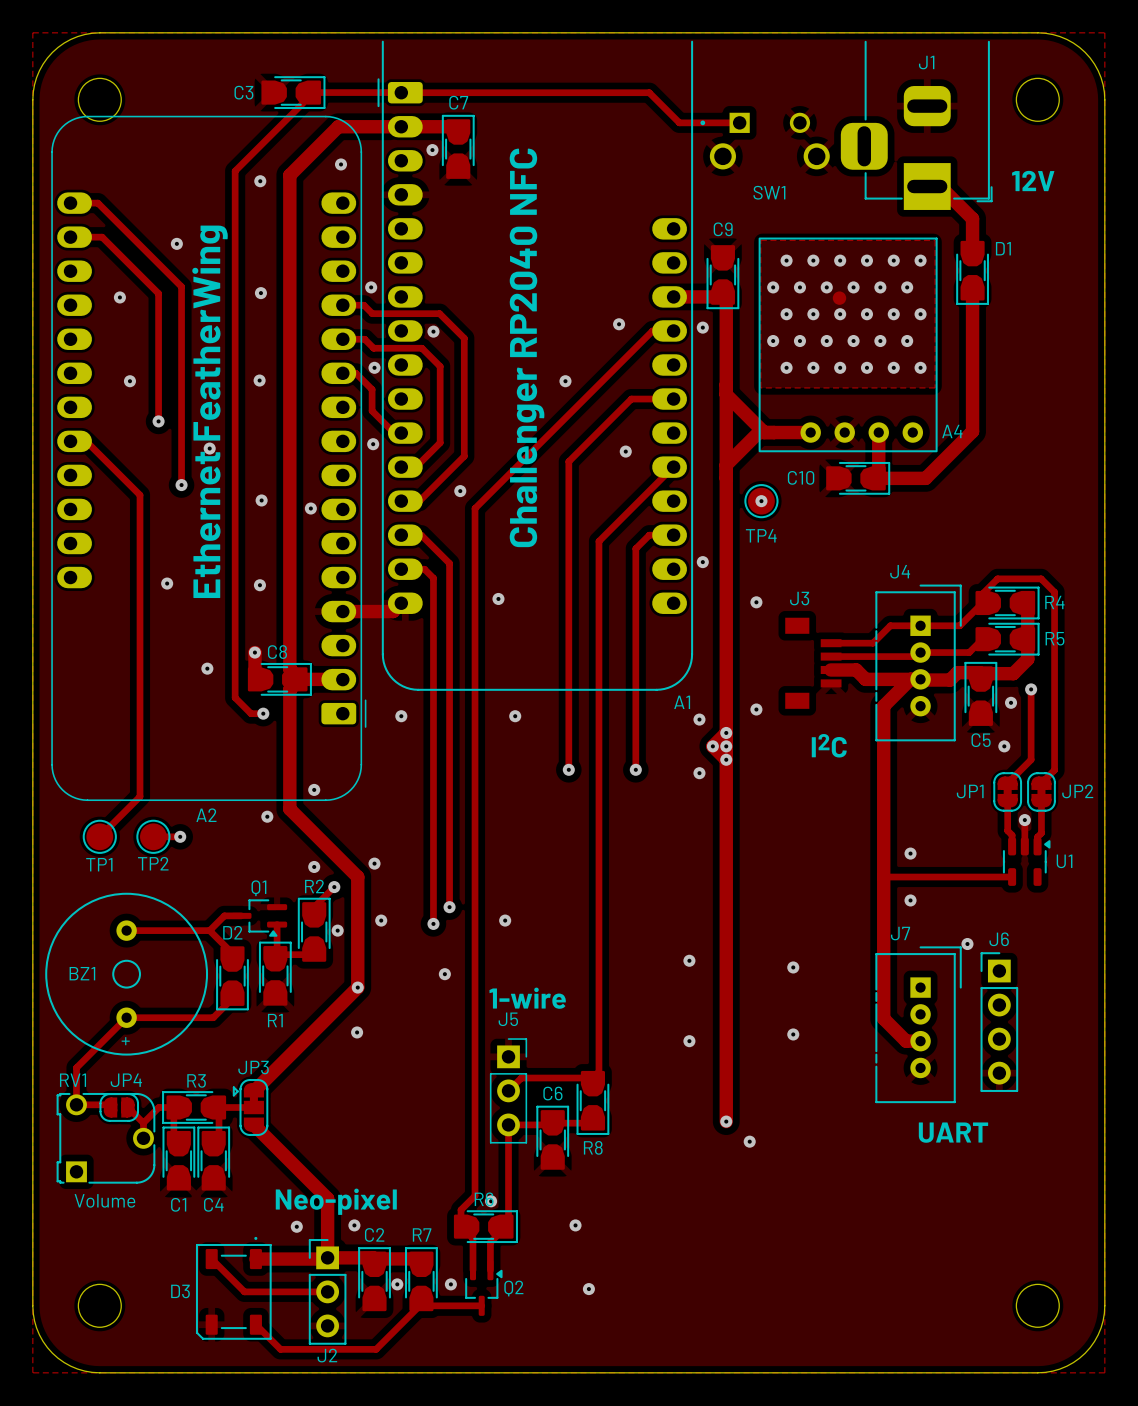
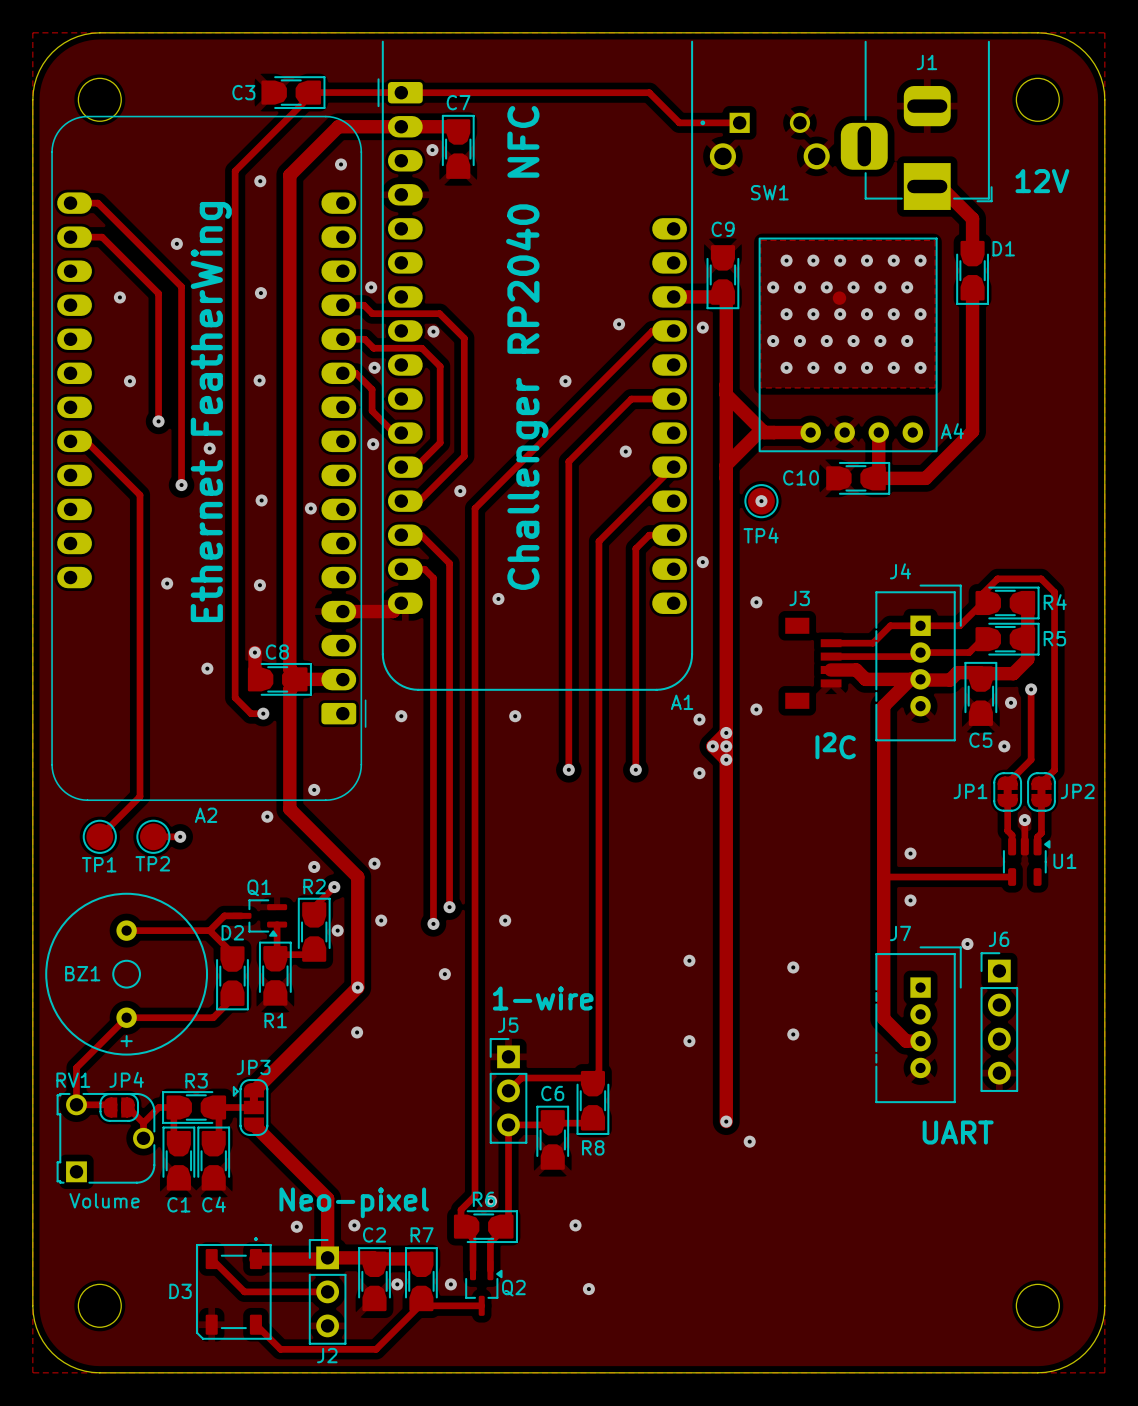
J5 footprint: [489, 1038, 528, 1144] -> [489, 1038, 528, 1144]

